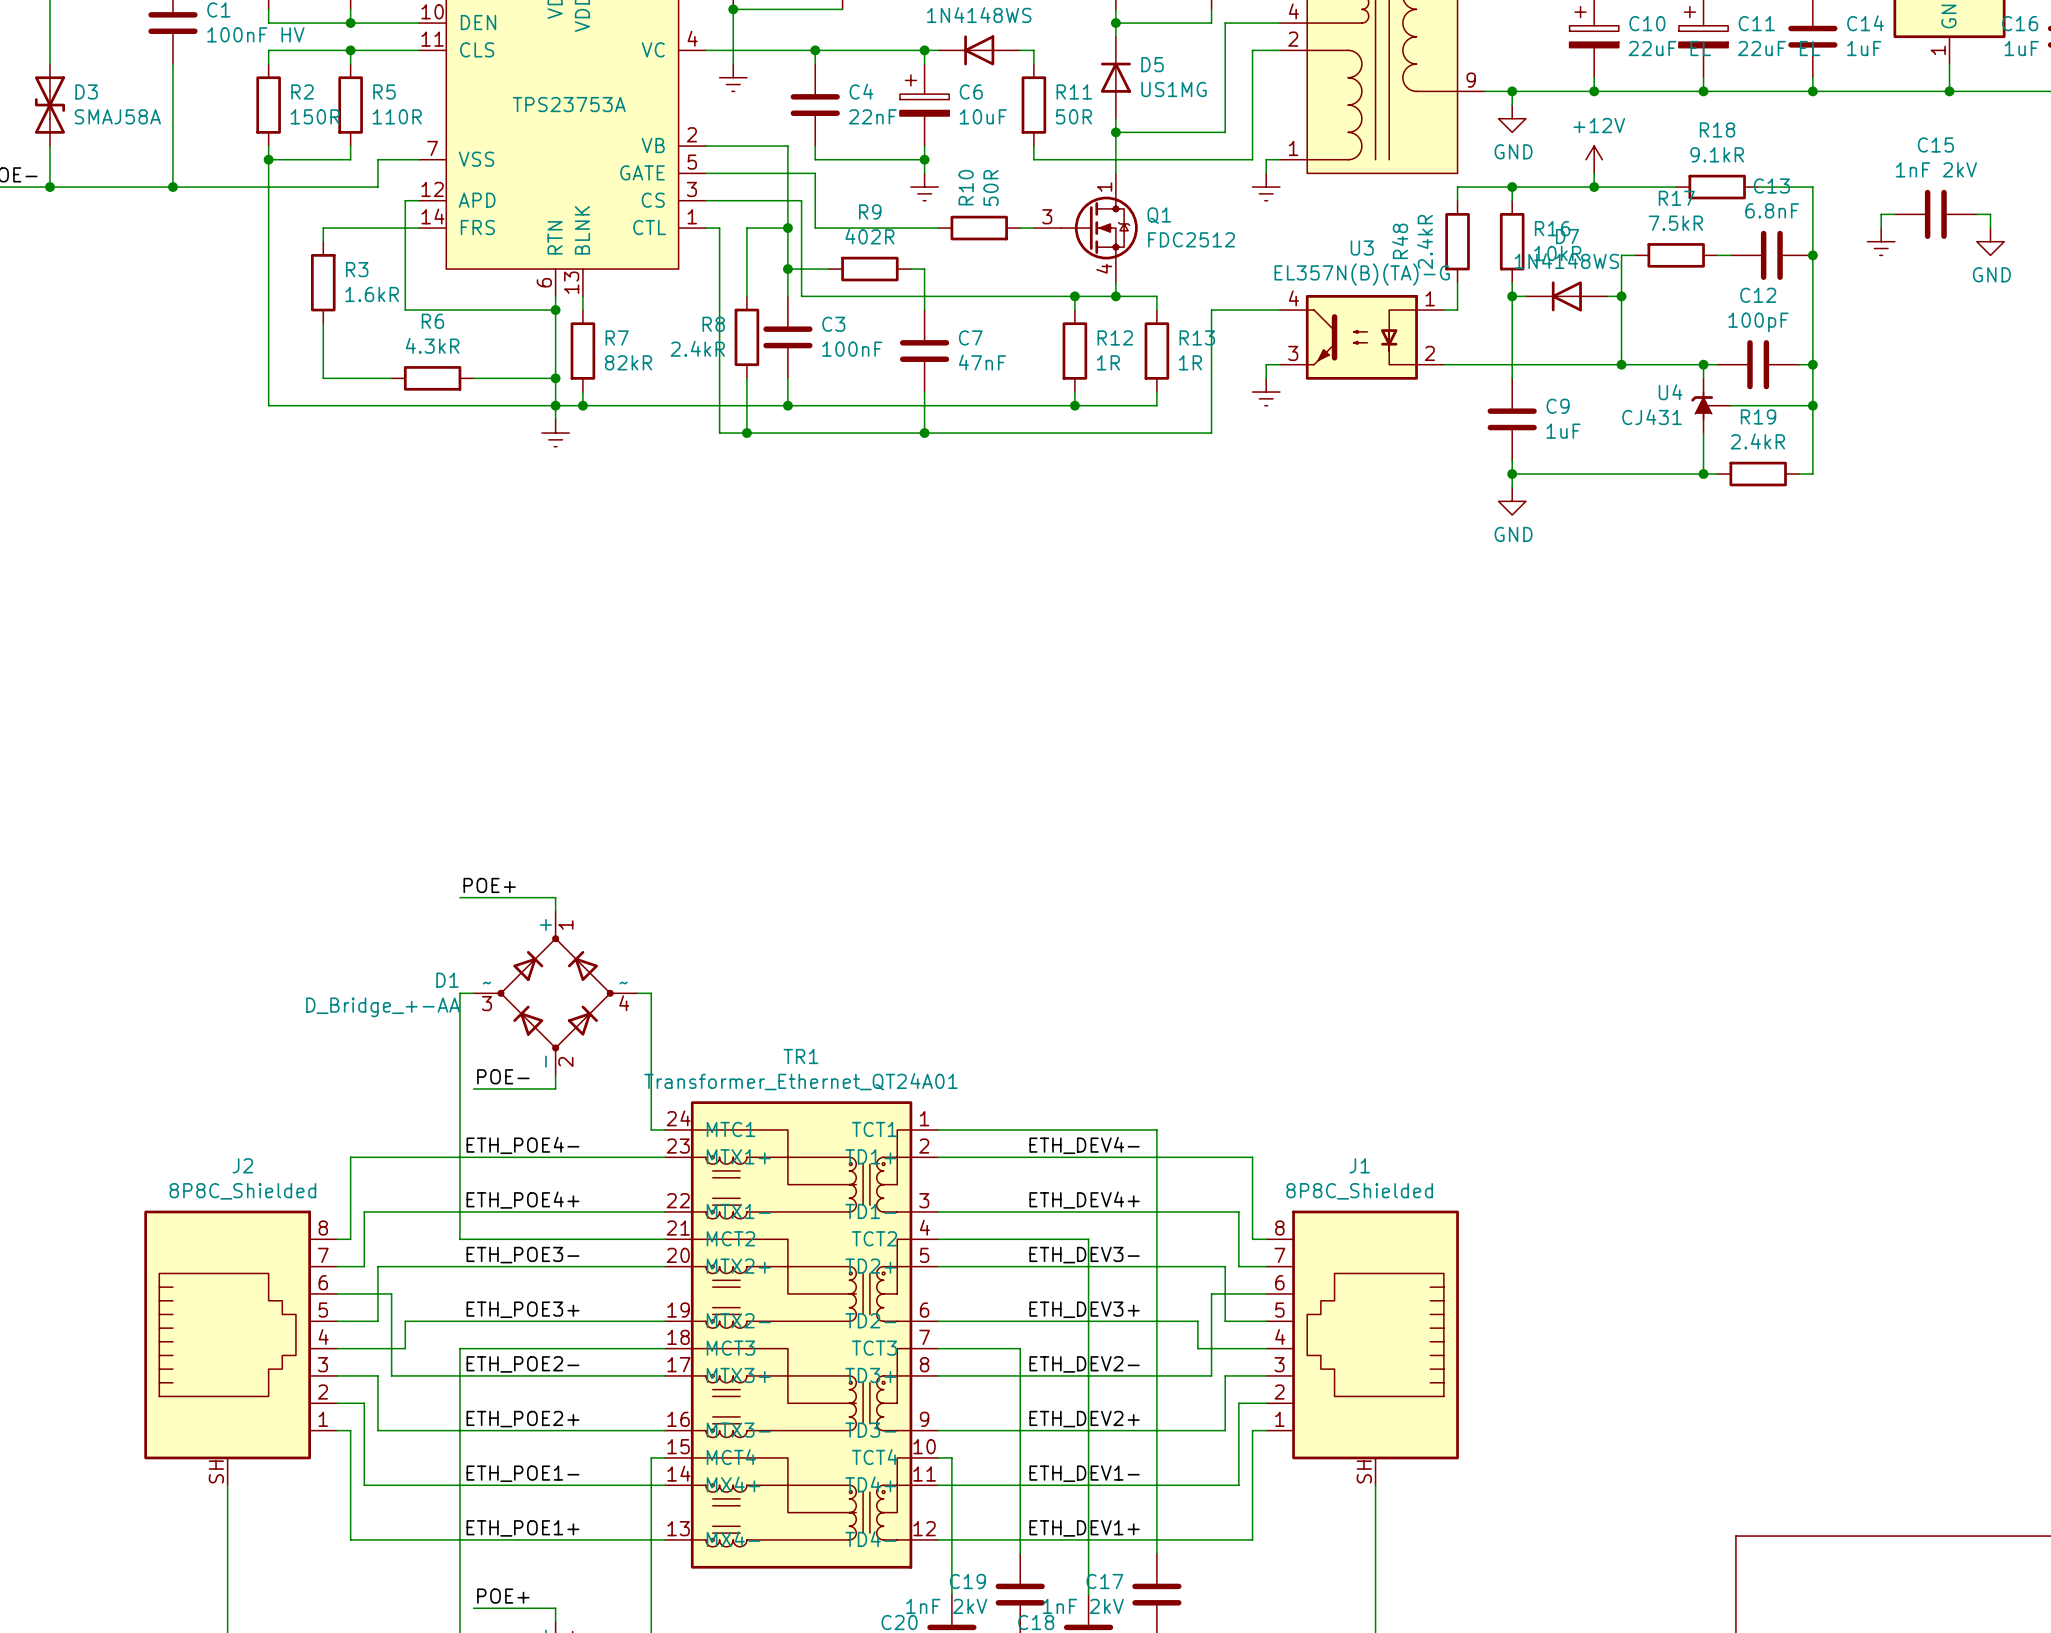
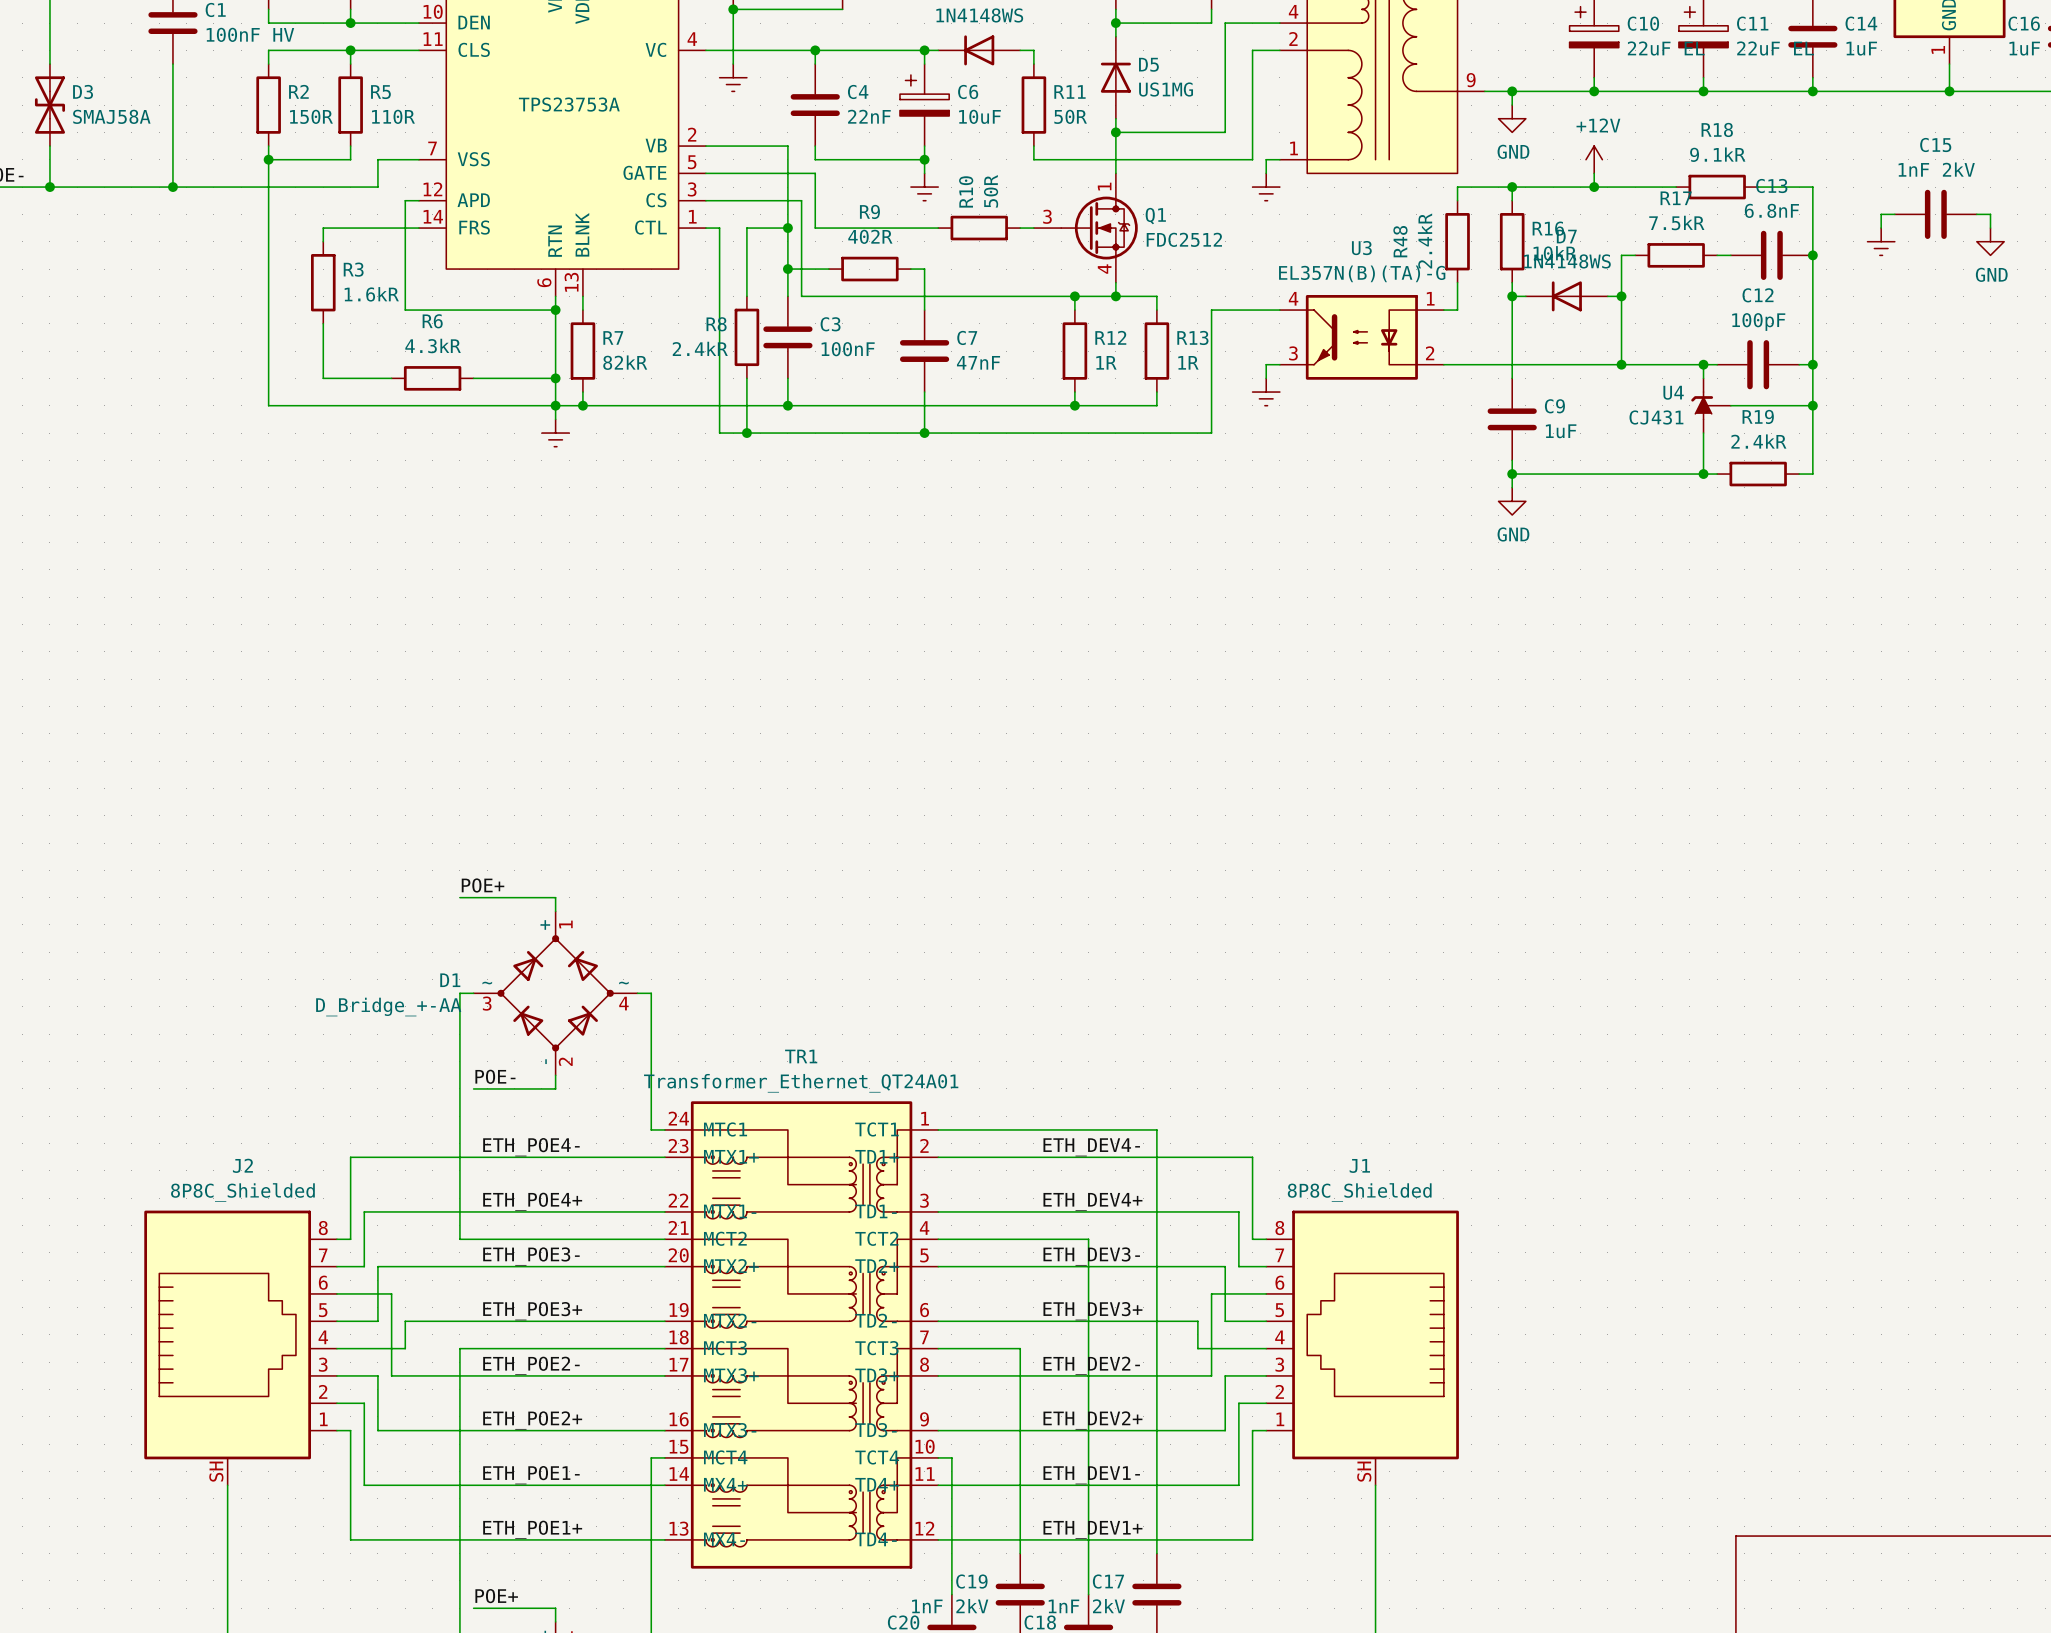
U4 symbol: [1691, 378, 1731, 434] -> [1691, 378, 1731, 434]

